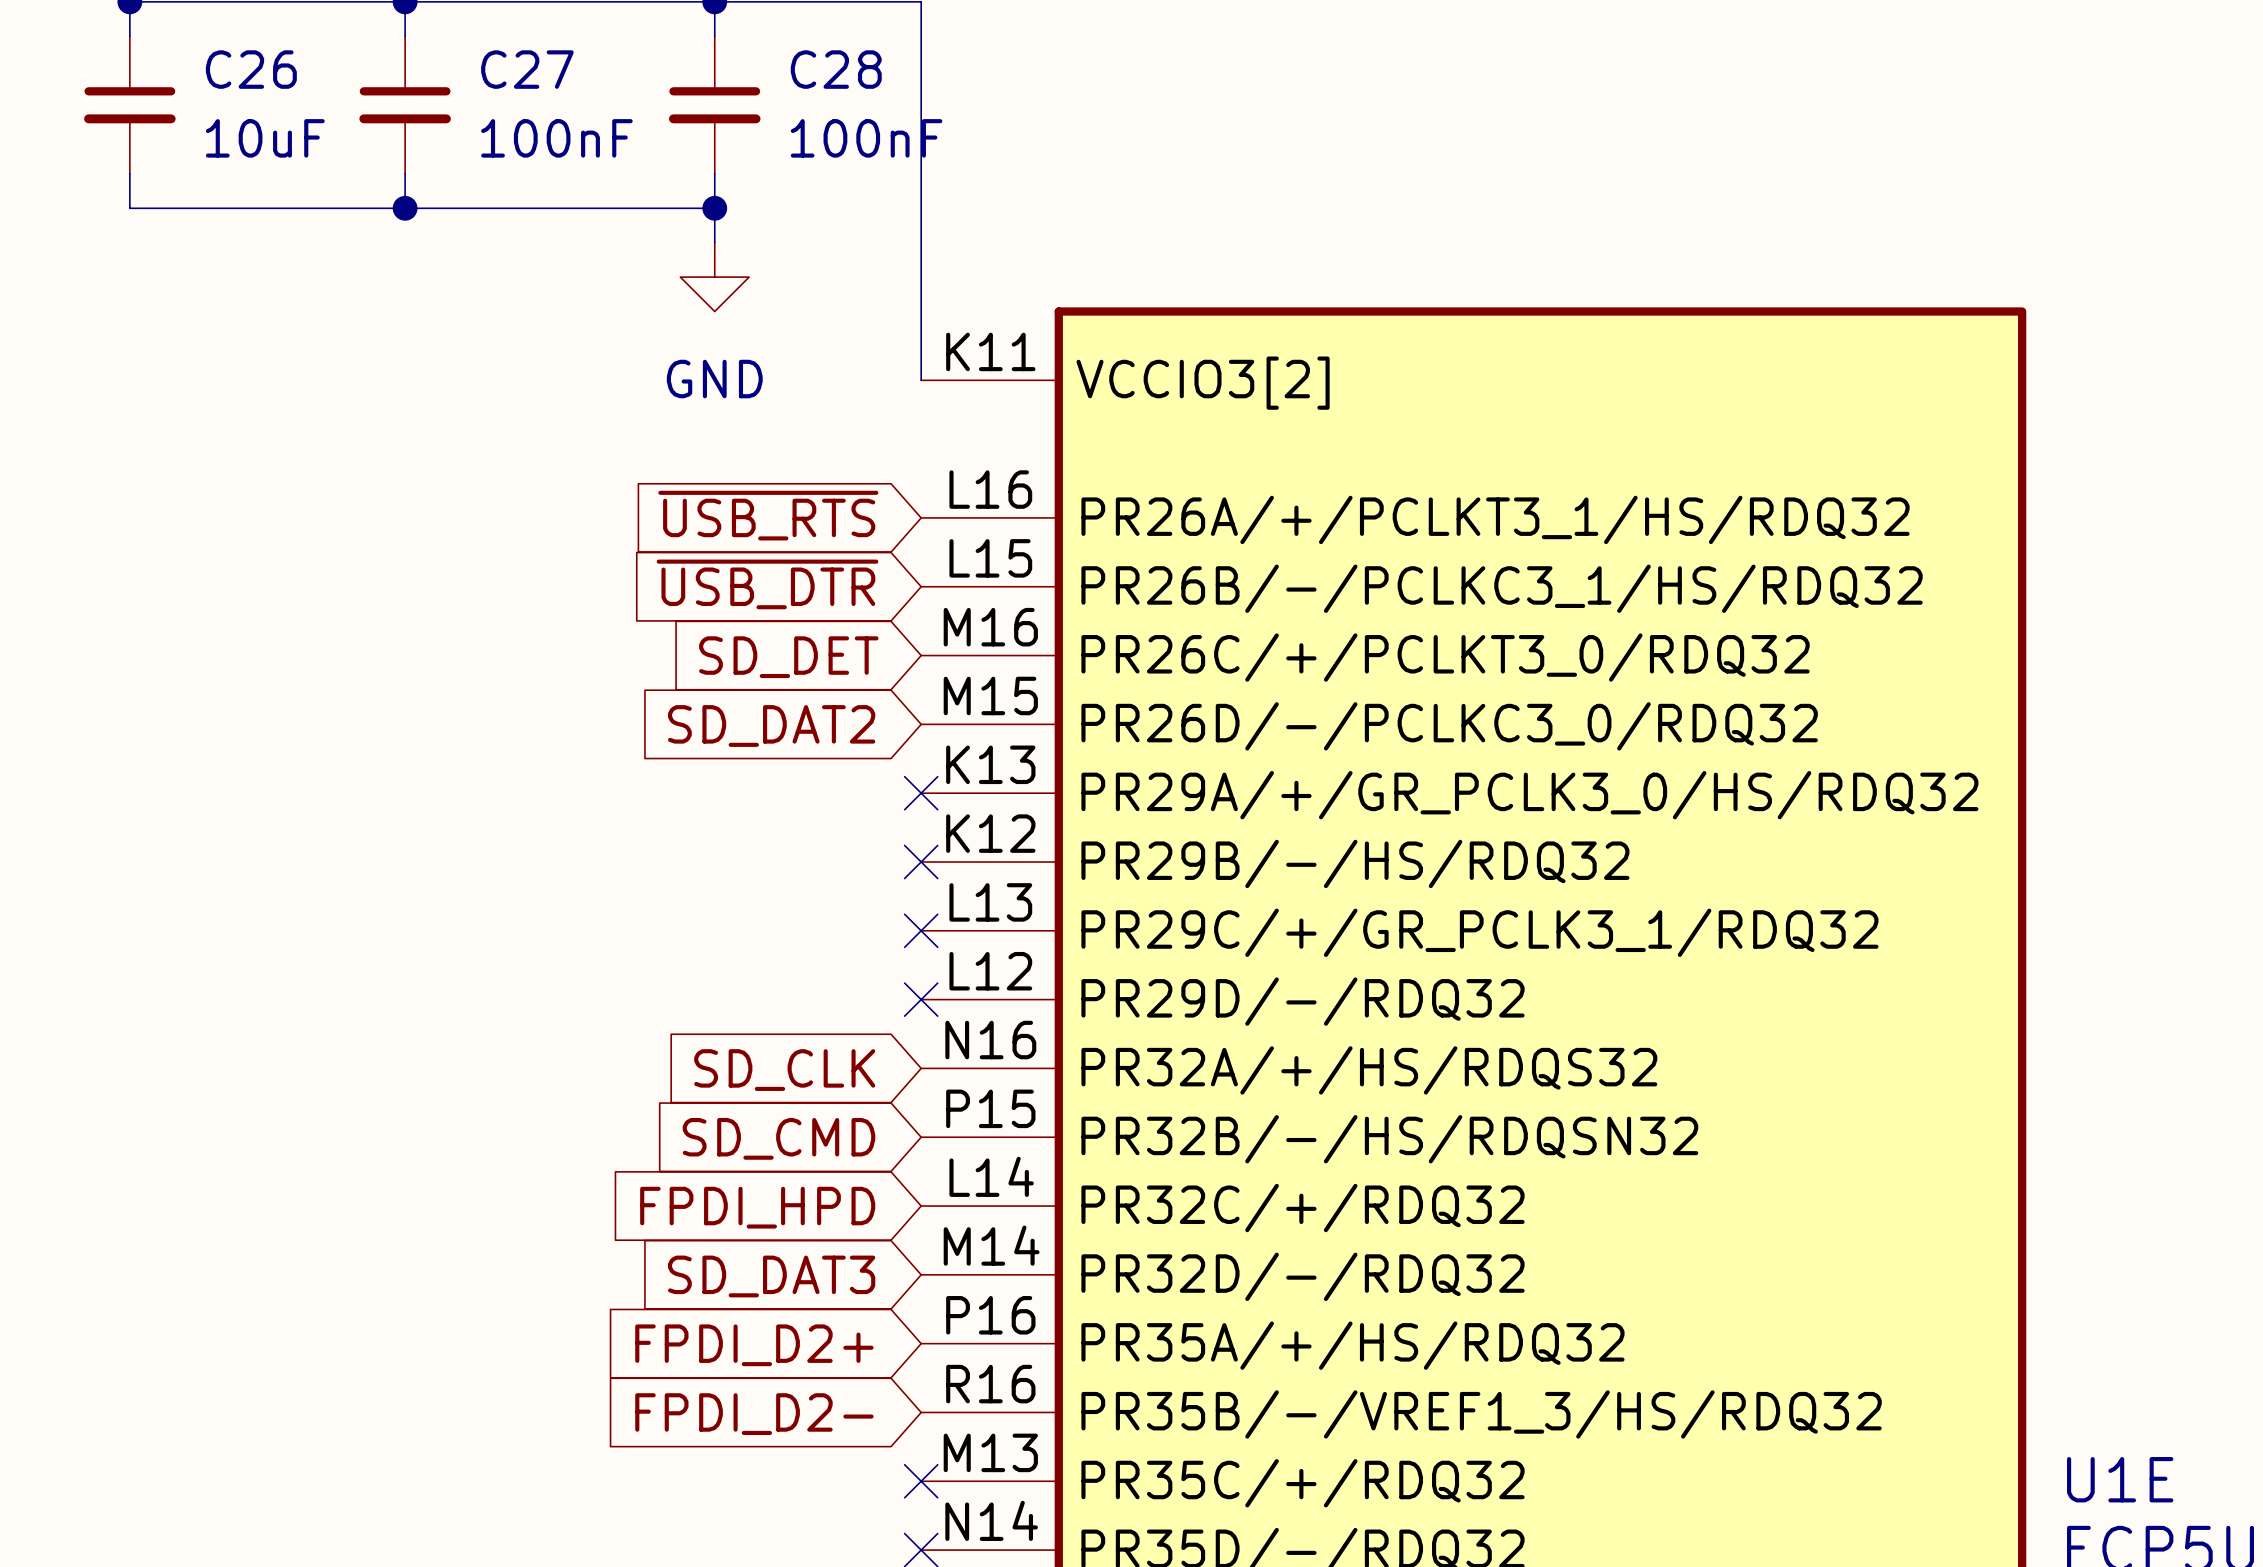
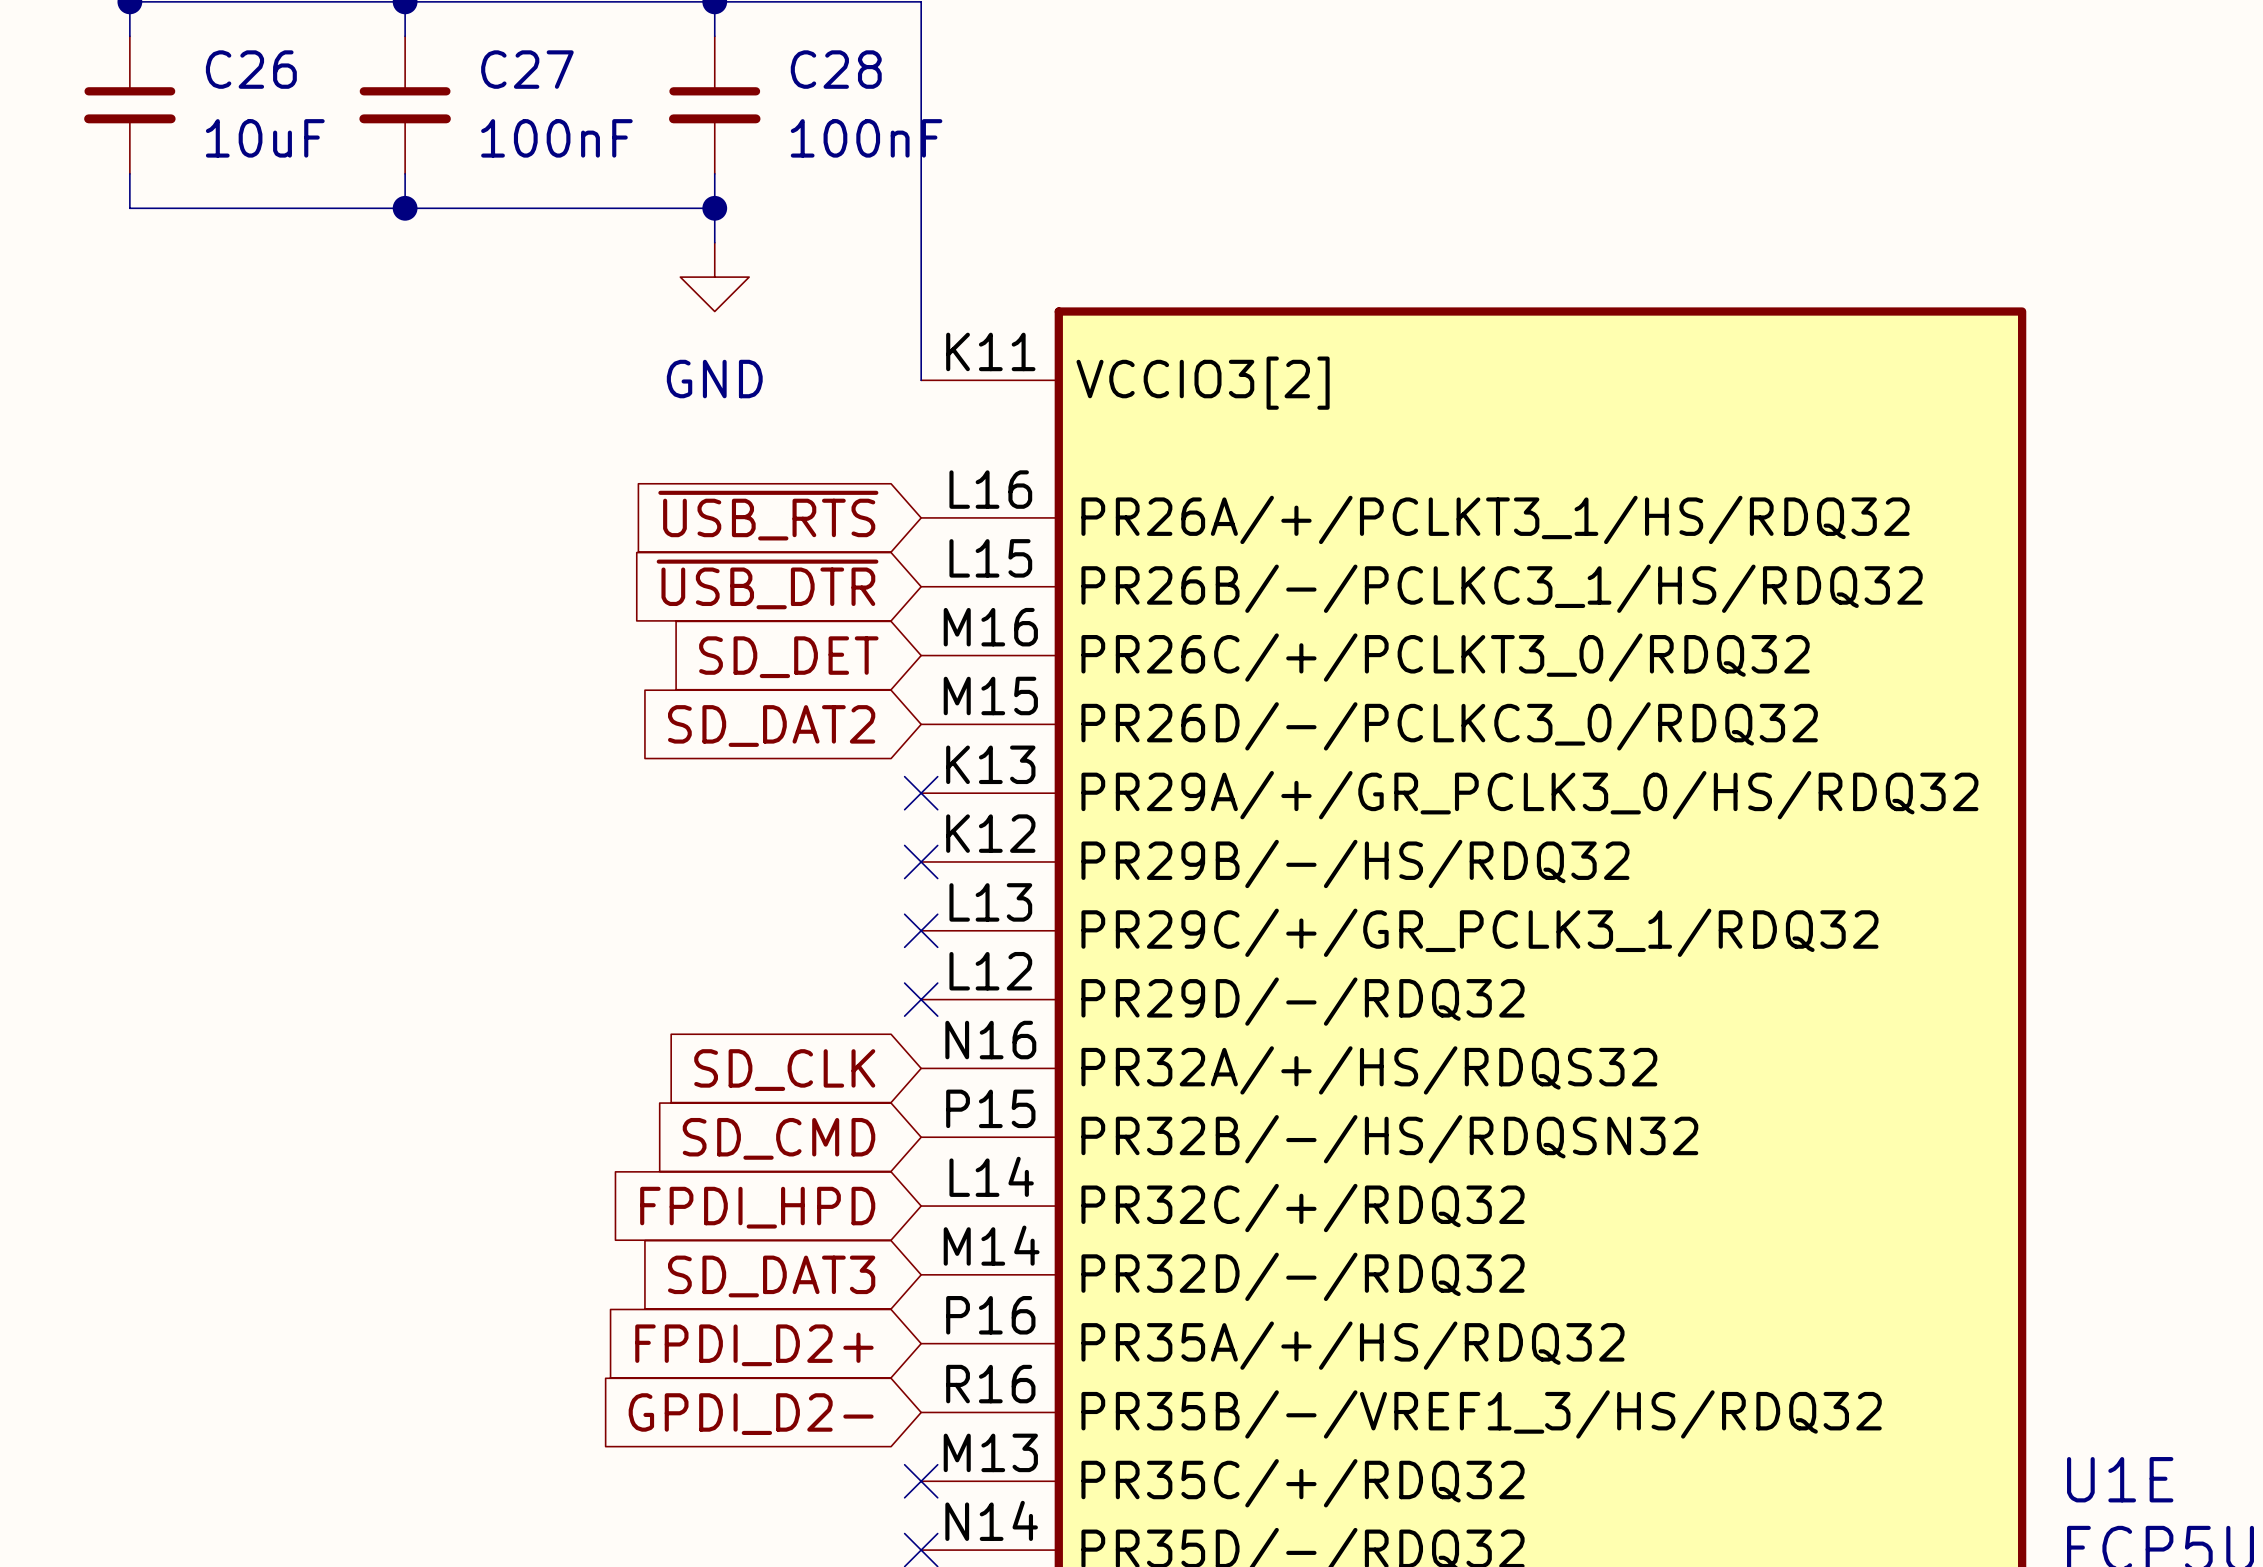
global label: FPDI_D2- (754, 1414) -> GPDI_D2- (751, 1414)

